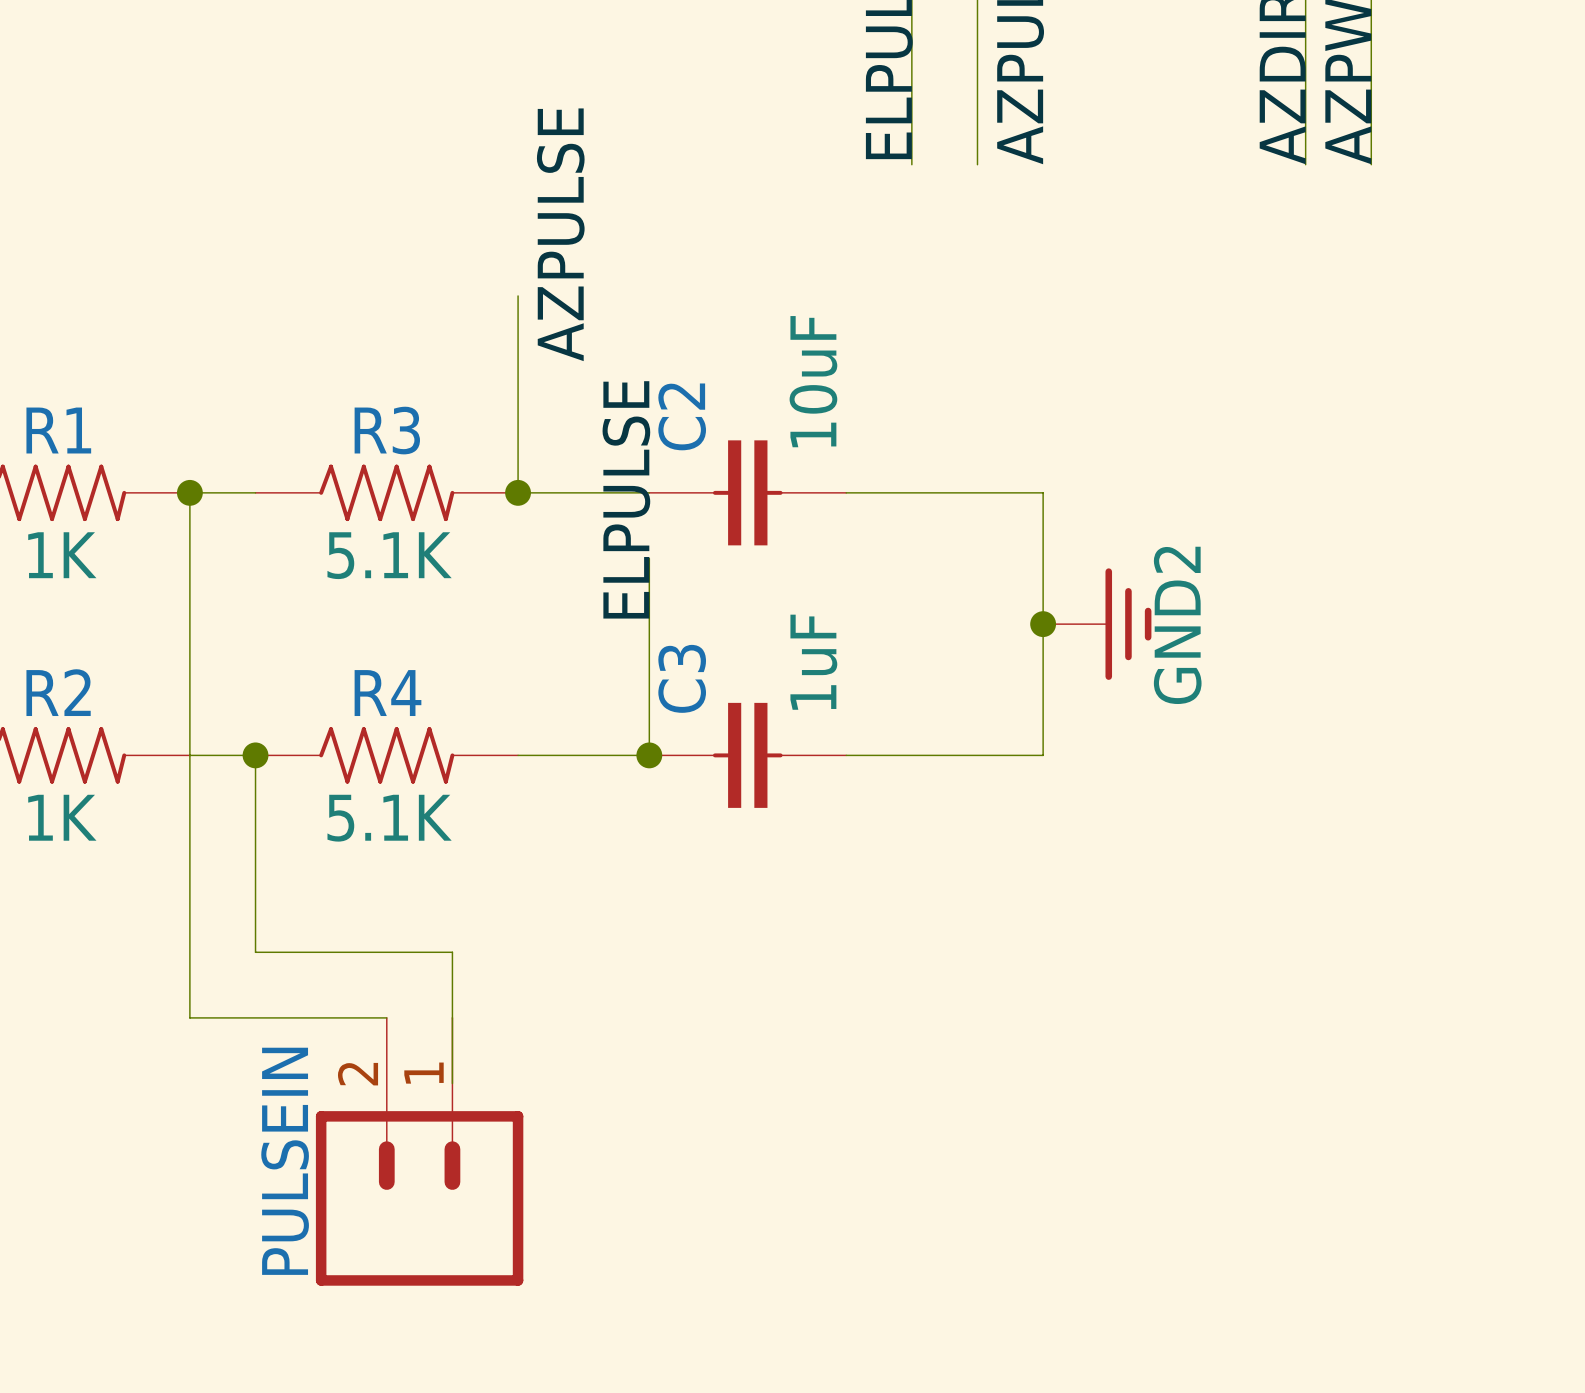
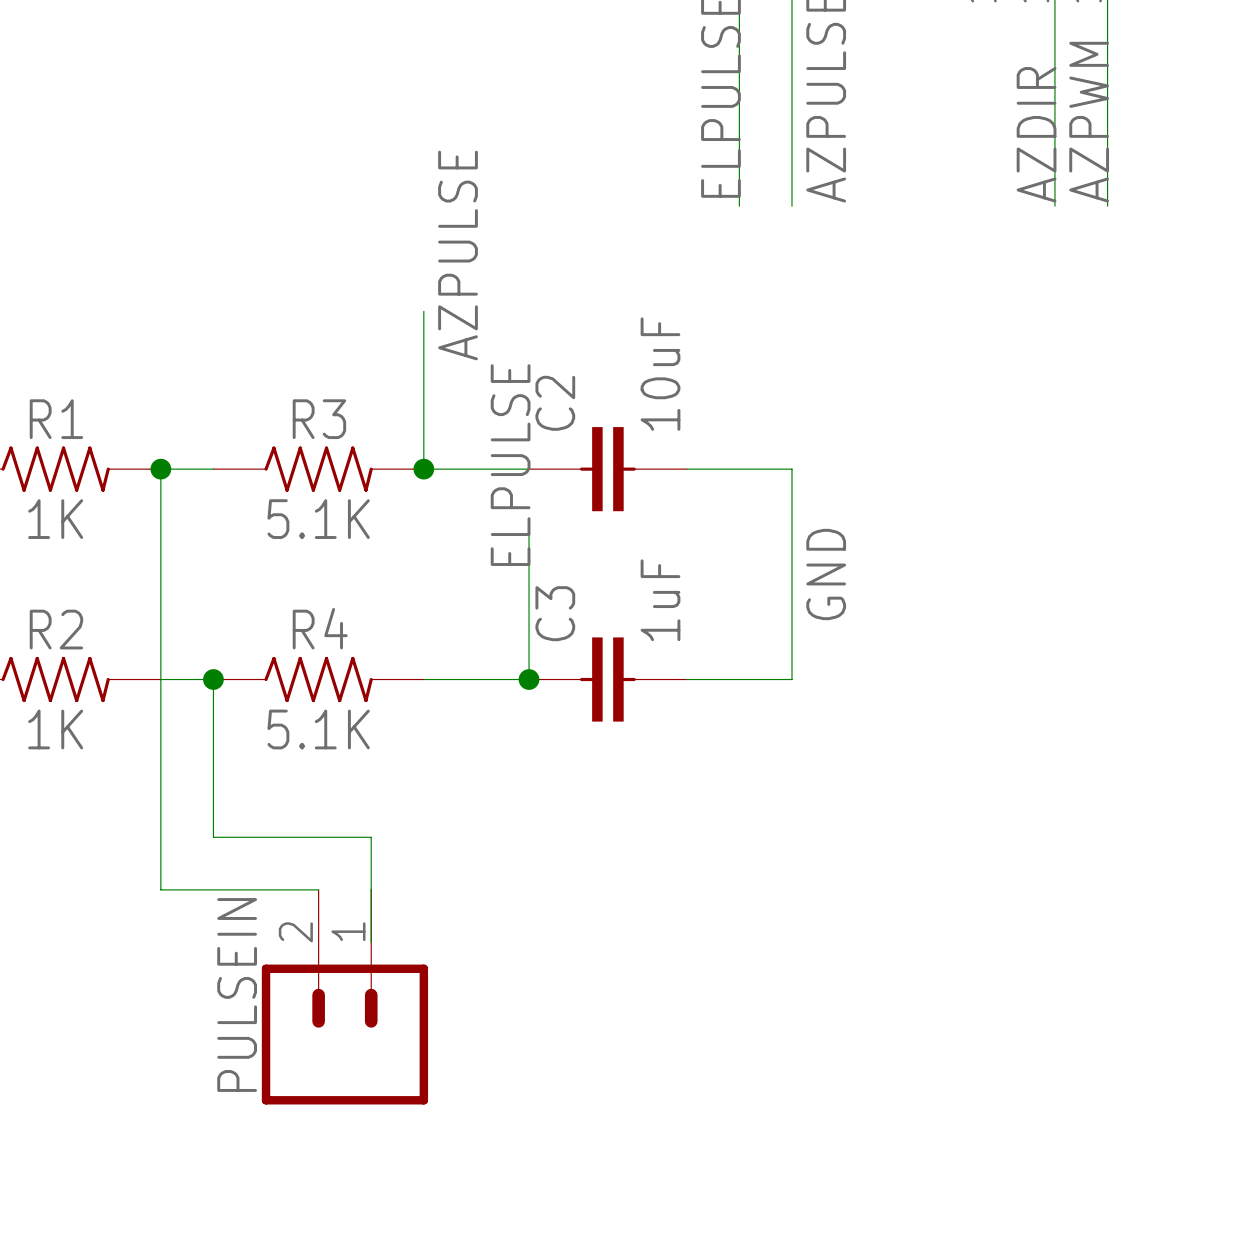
wire: (977, 492) (1043, 492) (1043, 755) (977, 755) -> (791, 469) (791, 679)
label: none -> GND (826, 574)
junction: (1043, 624) -> none
power symbol: GND2 (1097, 624) -> none

